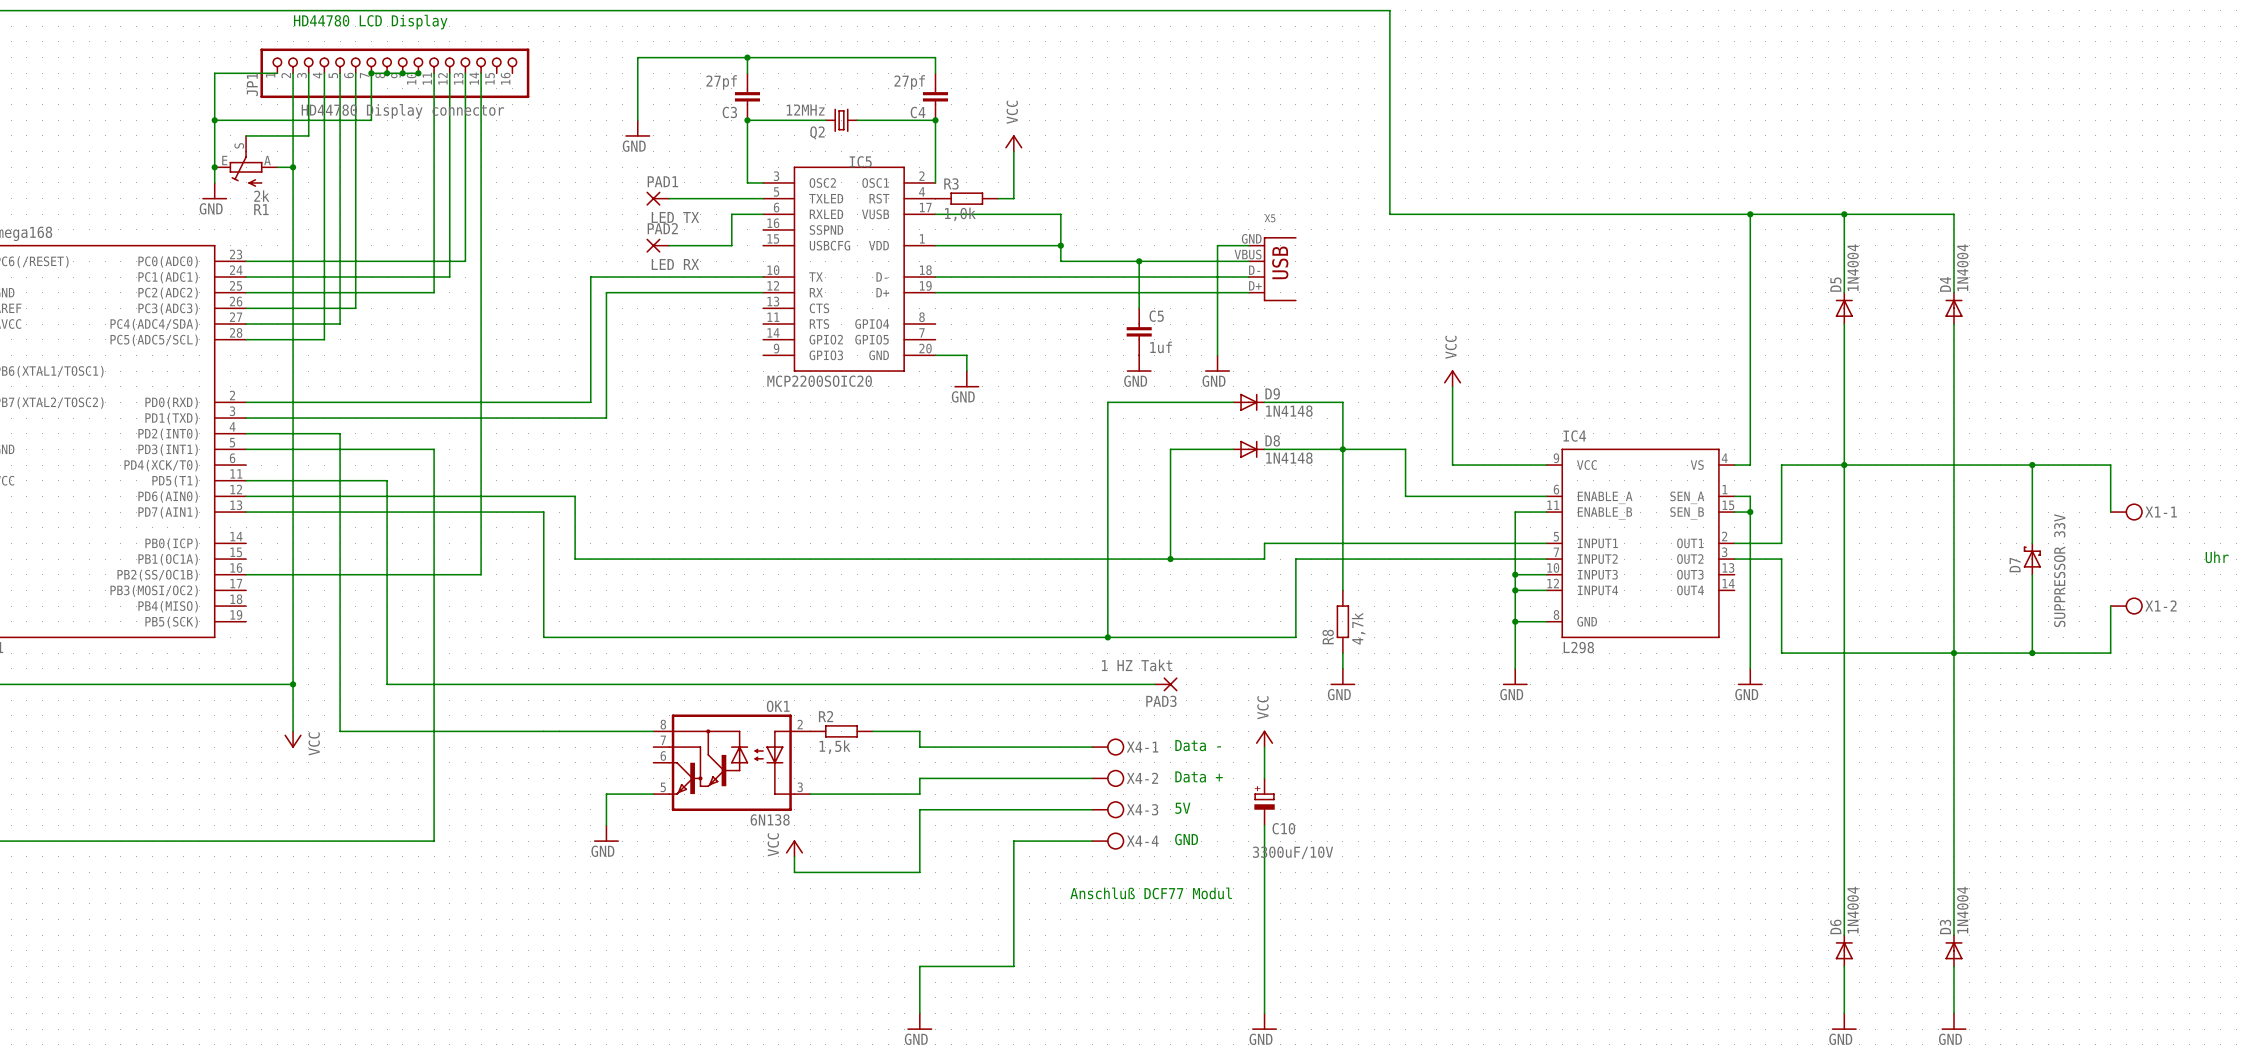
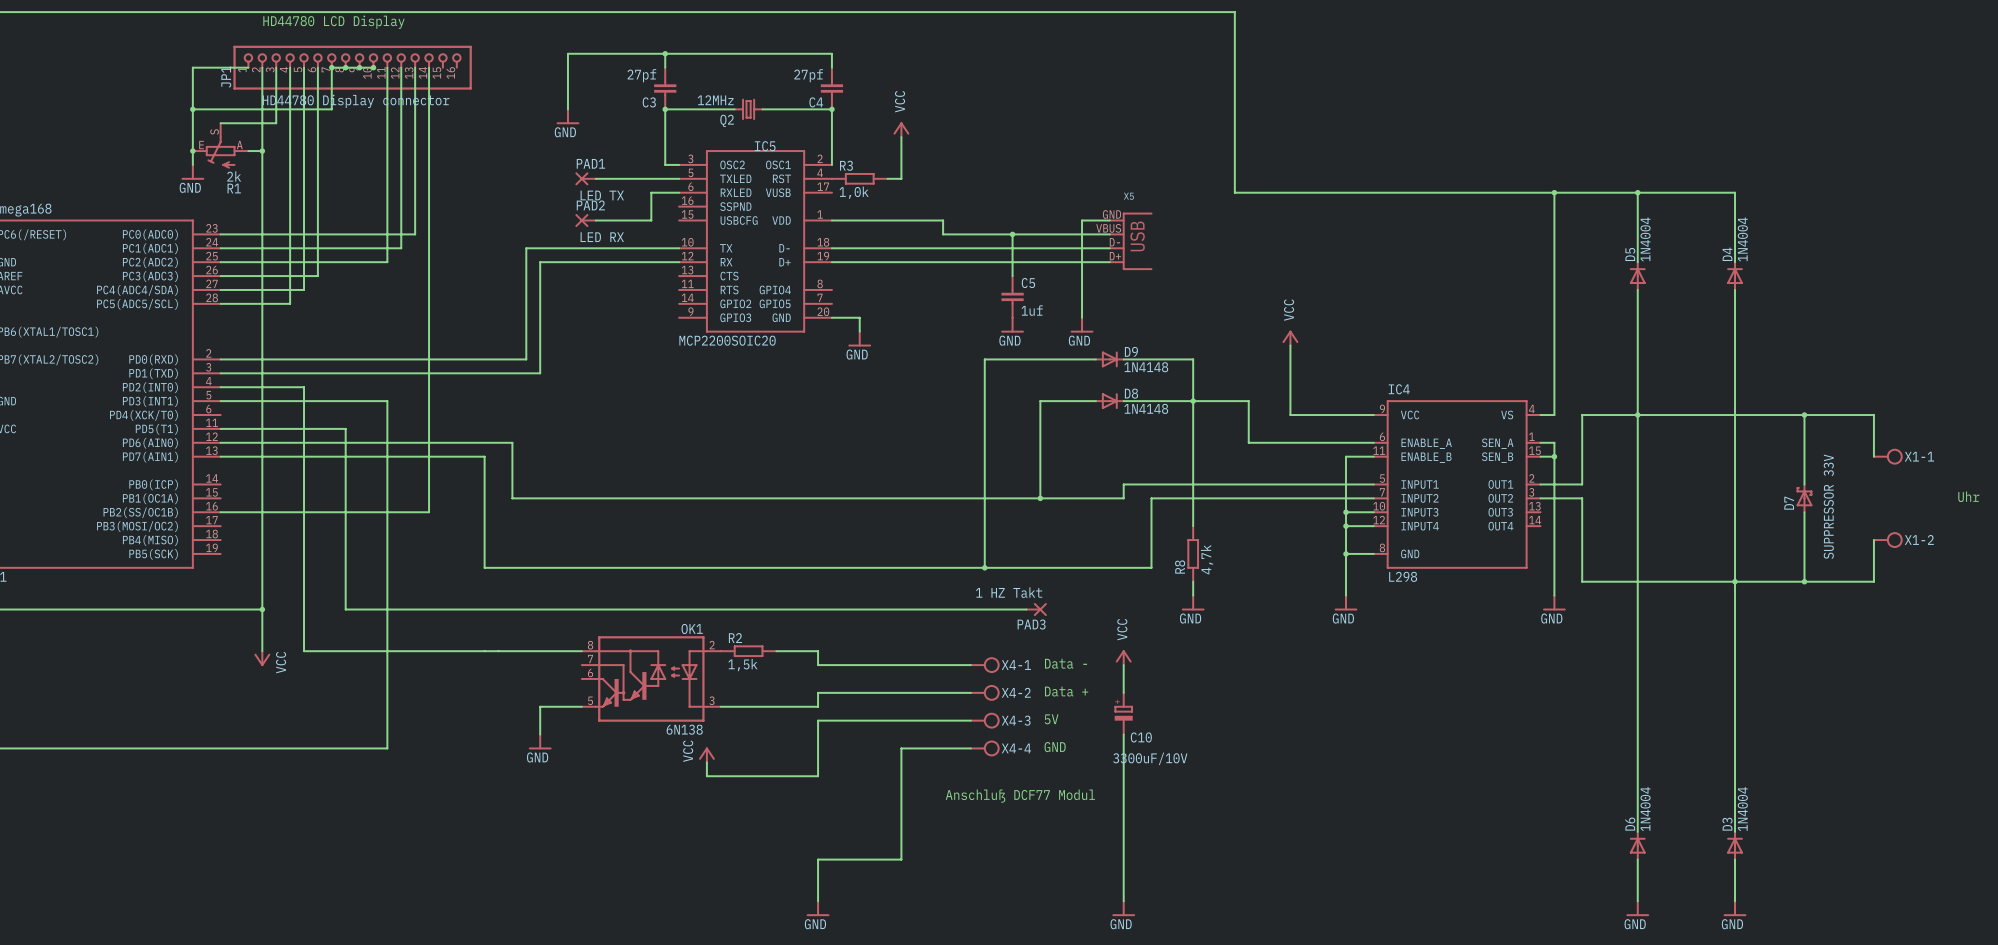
wire: (935, 214) (1060, 214) (1060, 245) -> none
junction: (1060, 245) -> none

